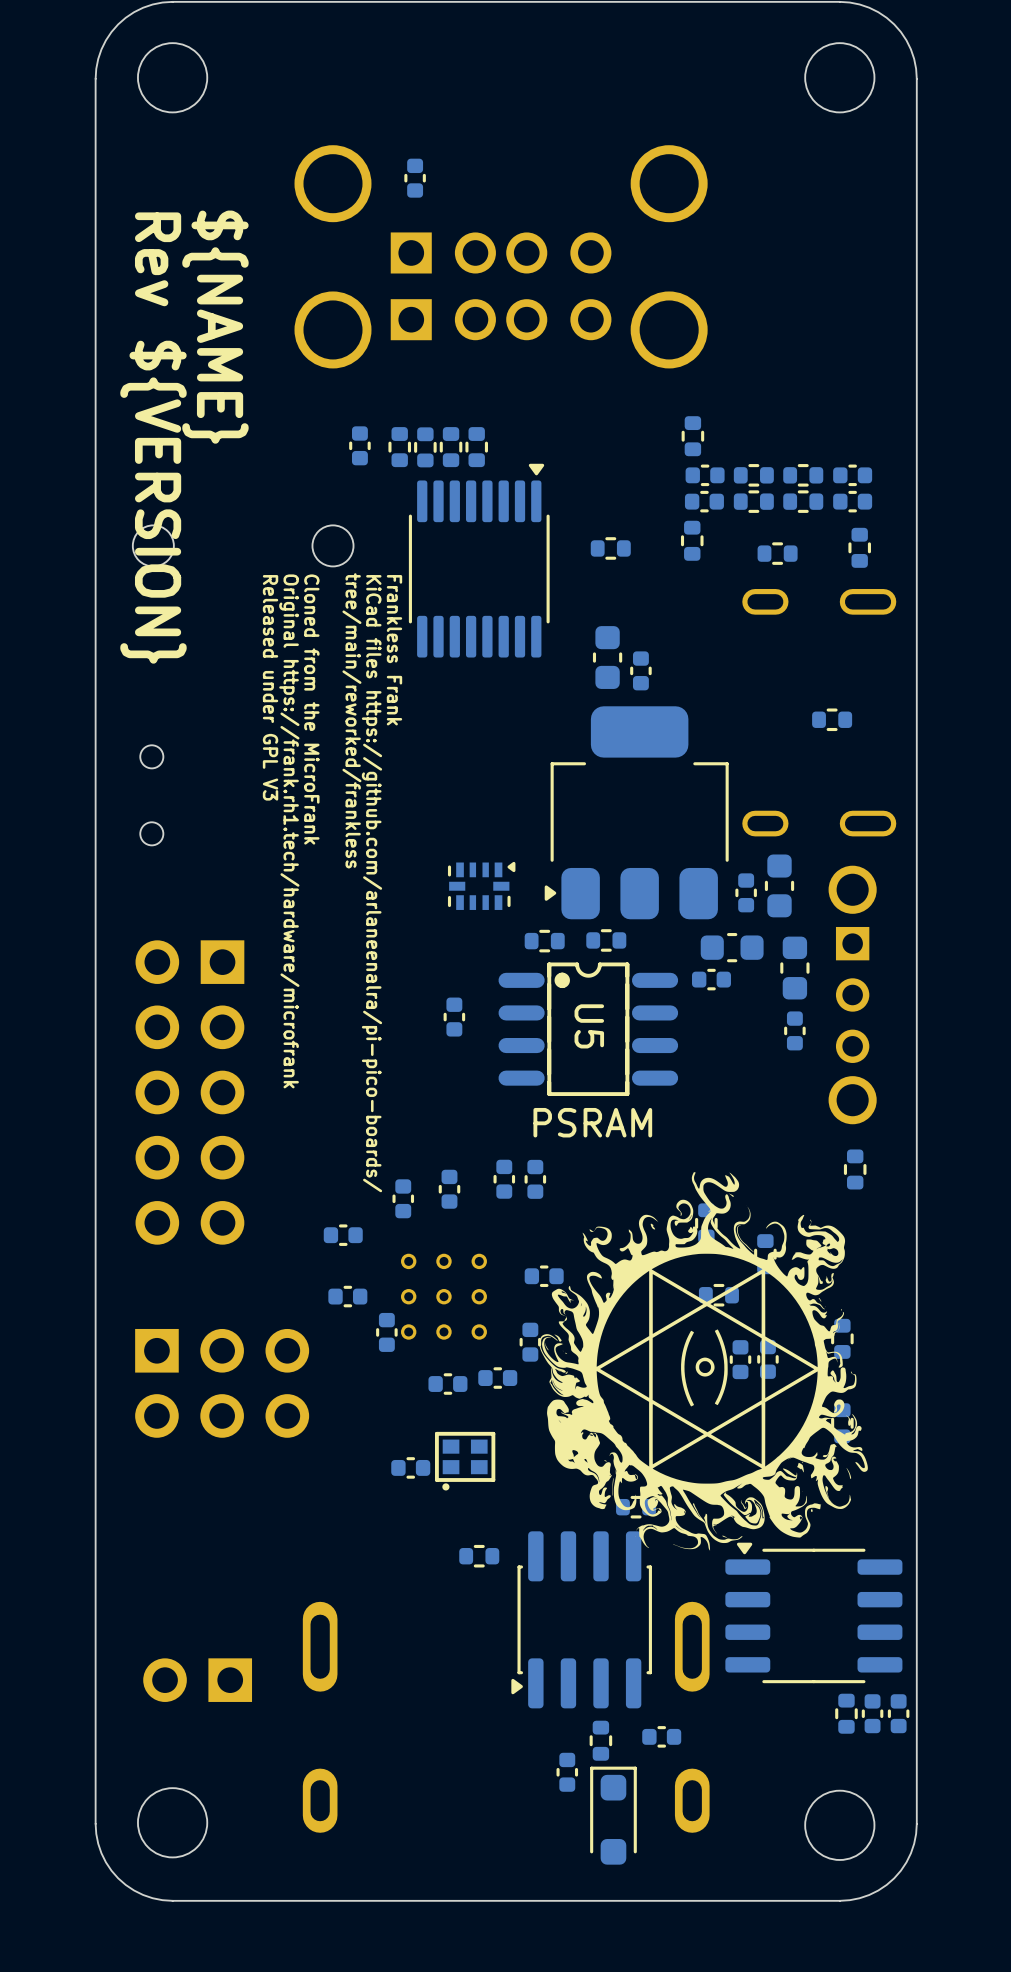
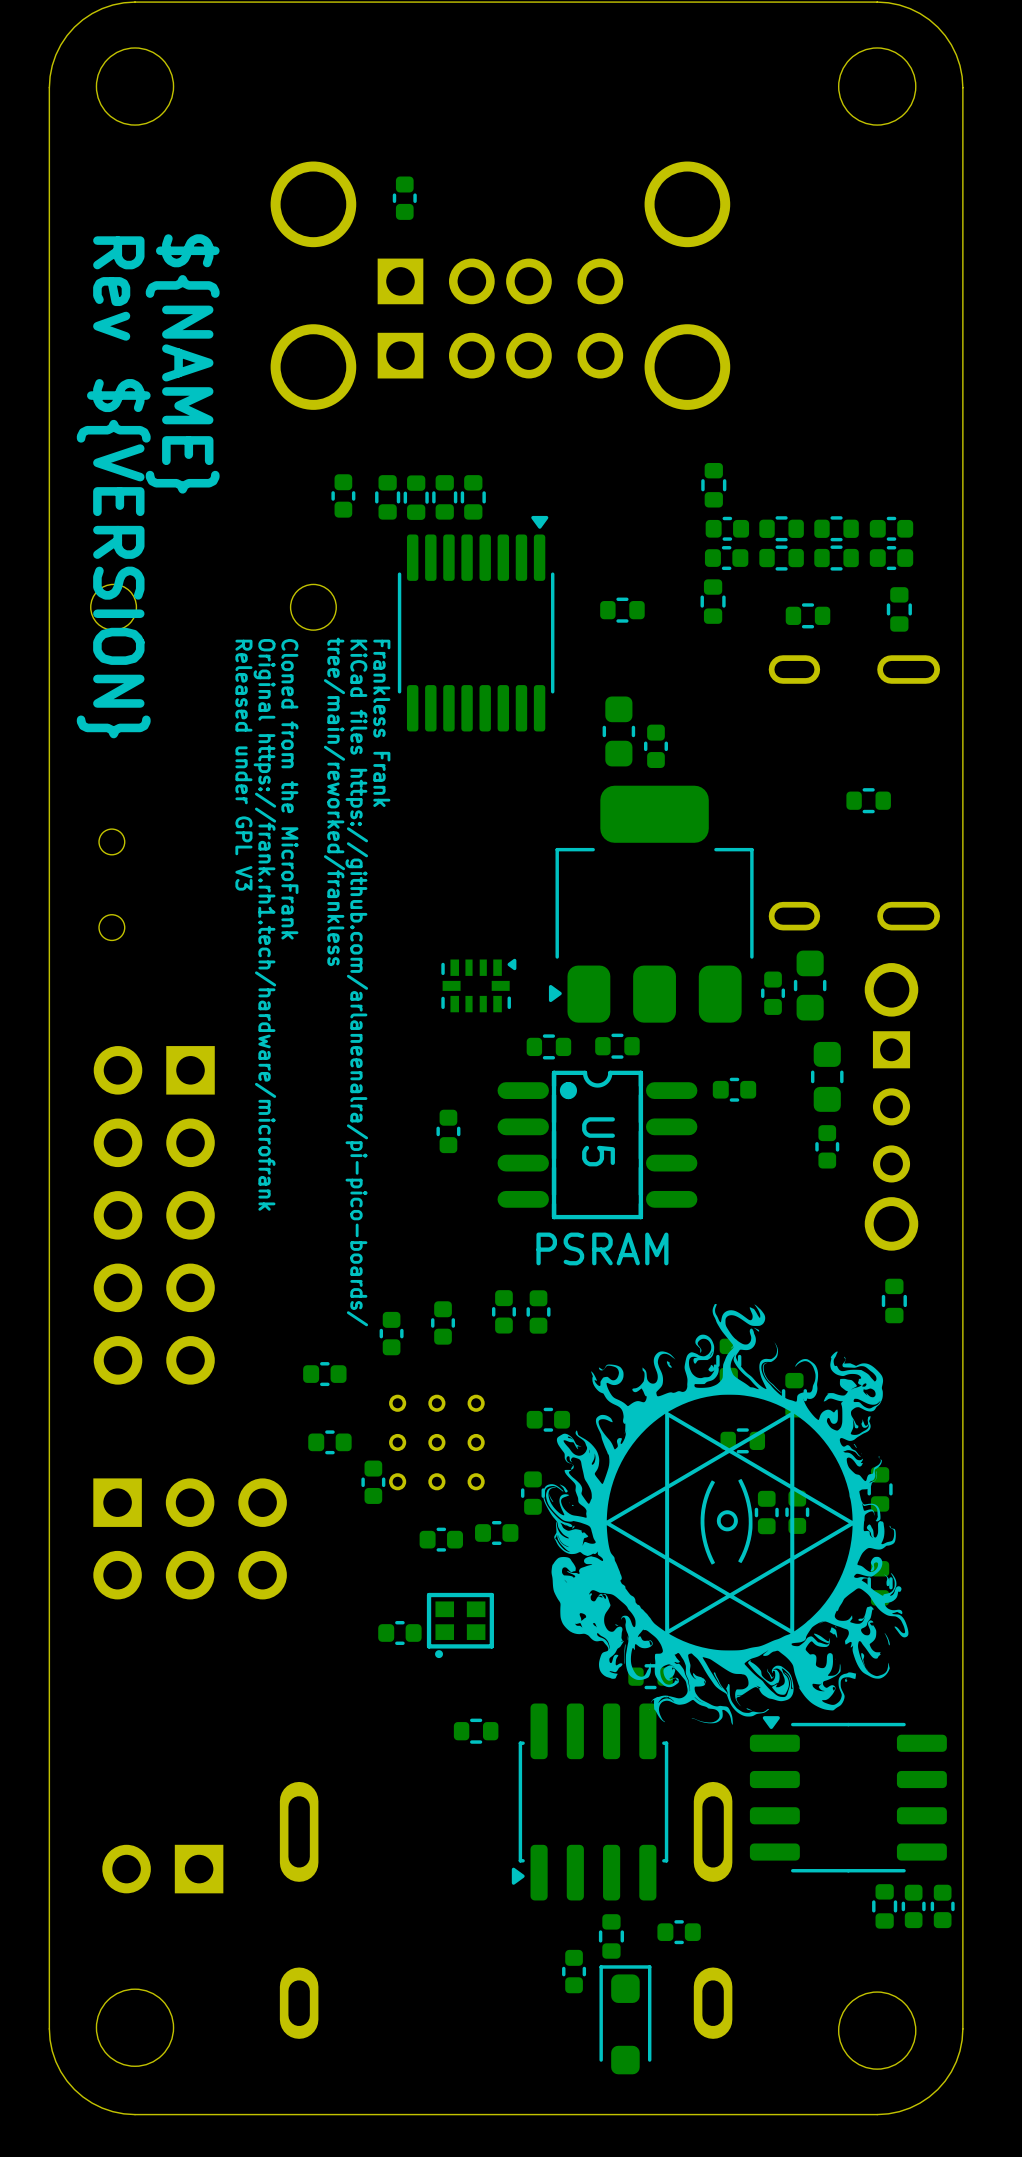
part: (732, 947) -> none

